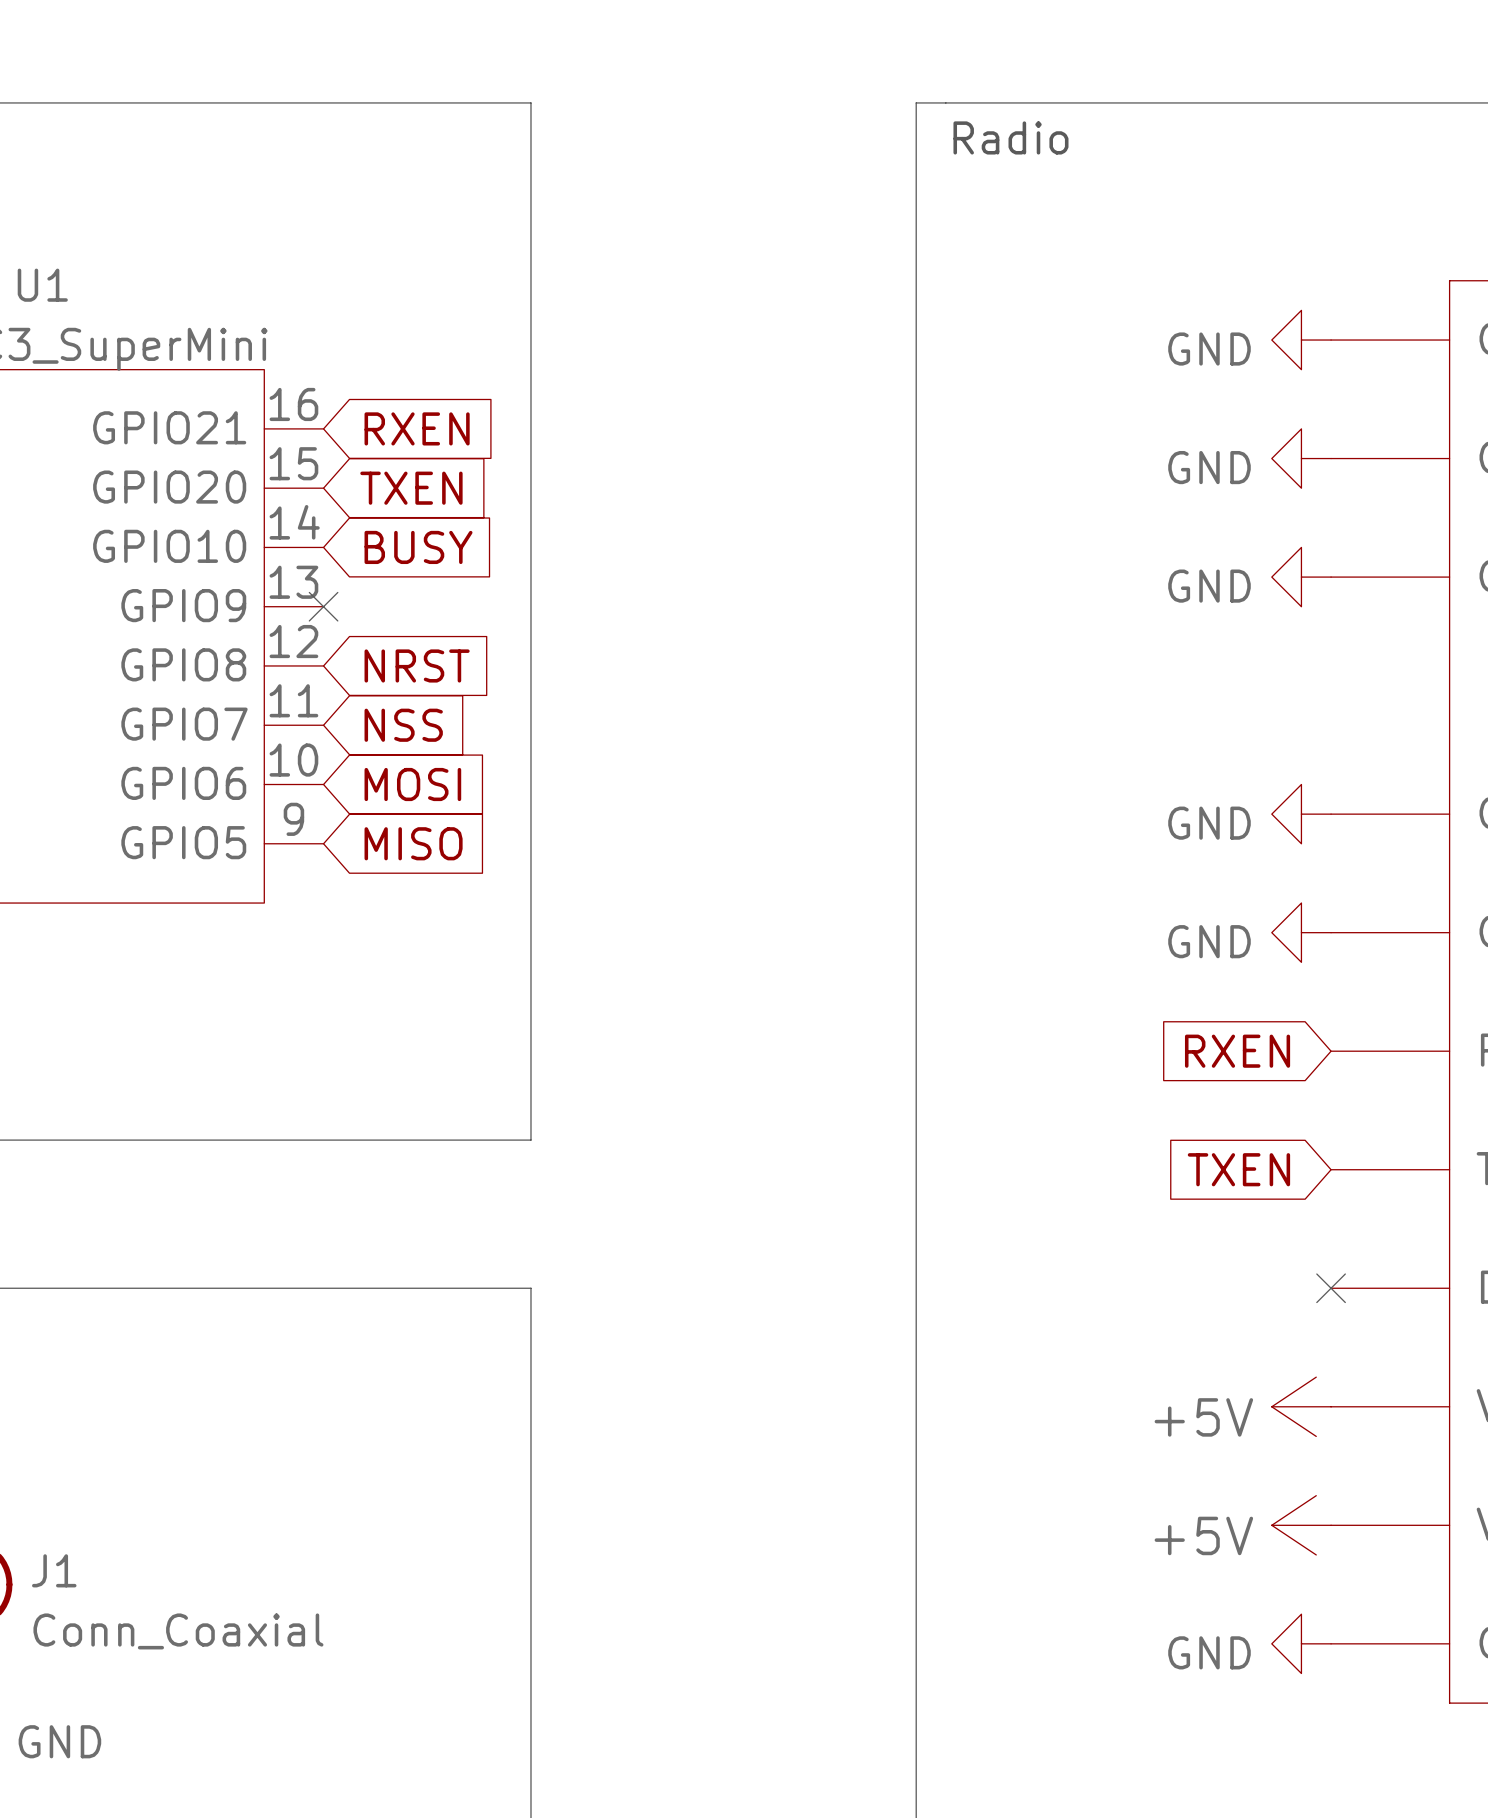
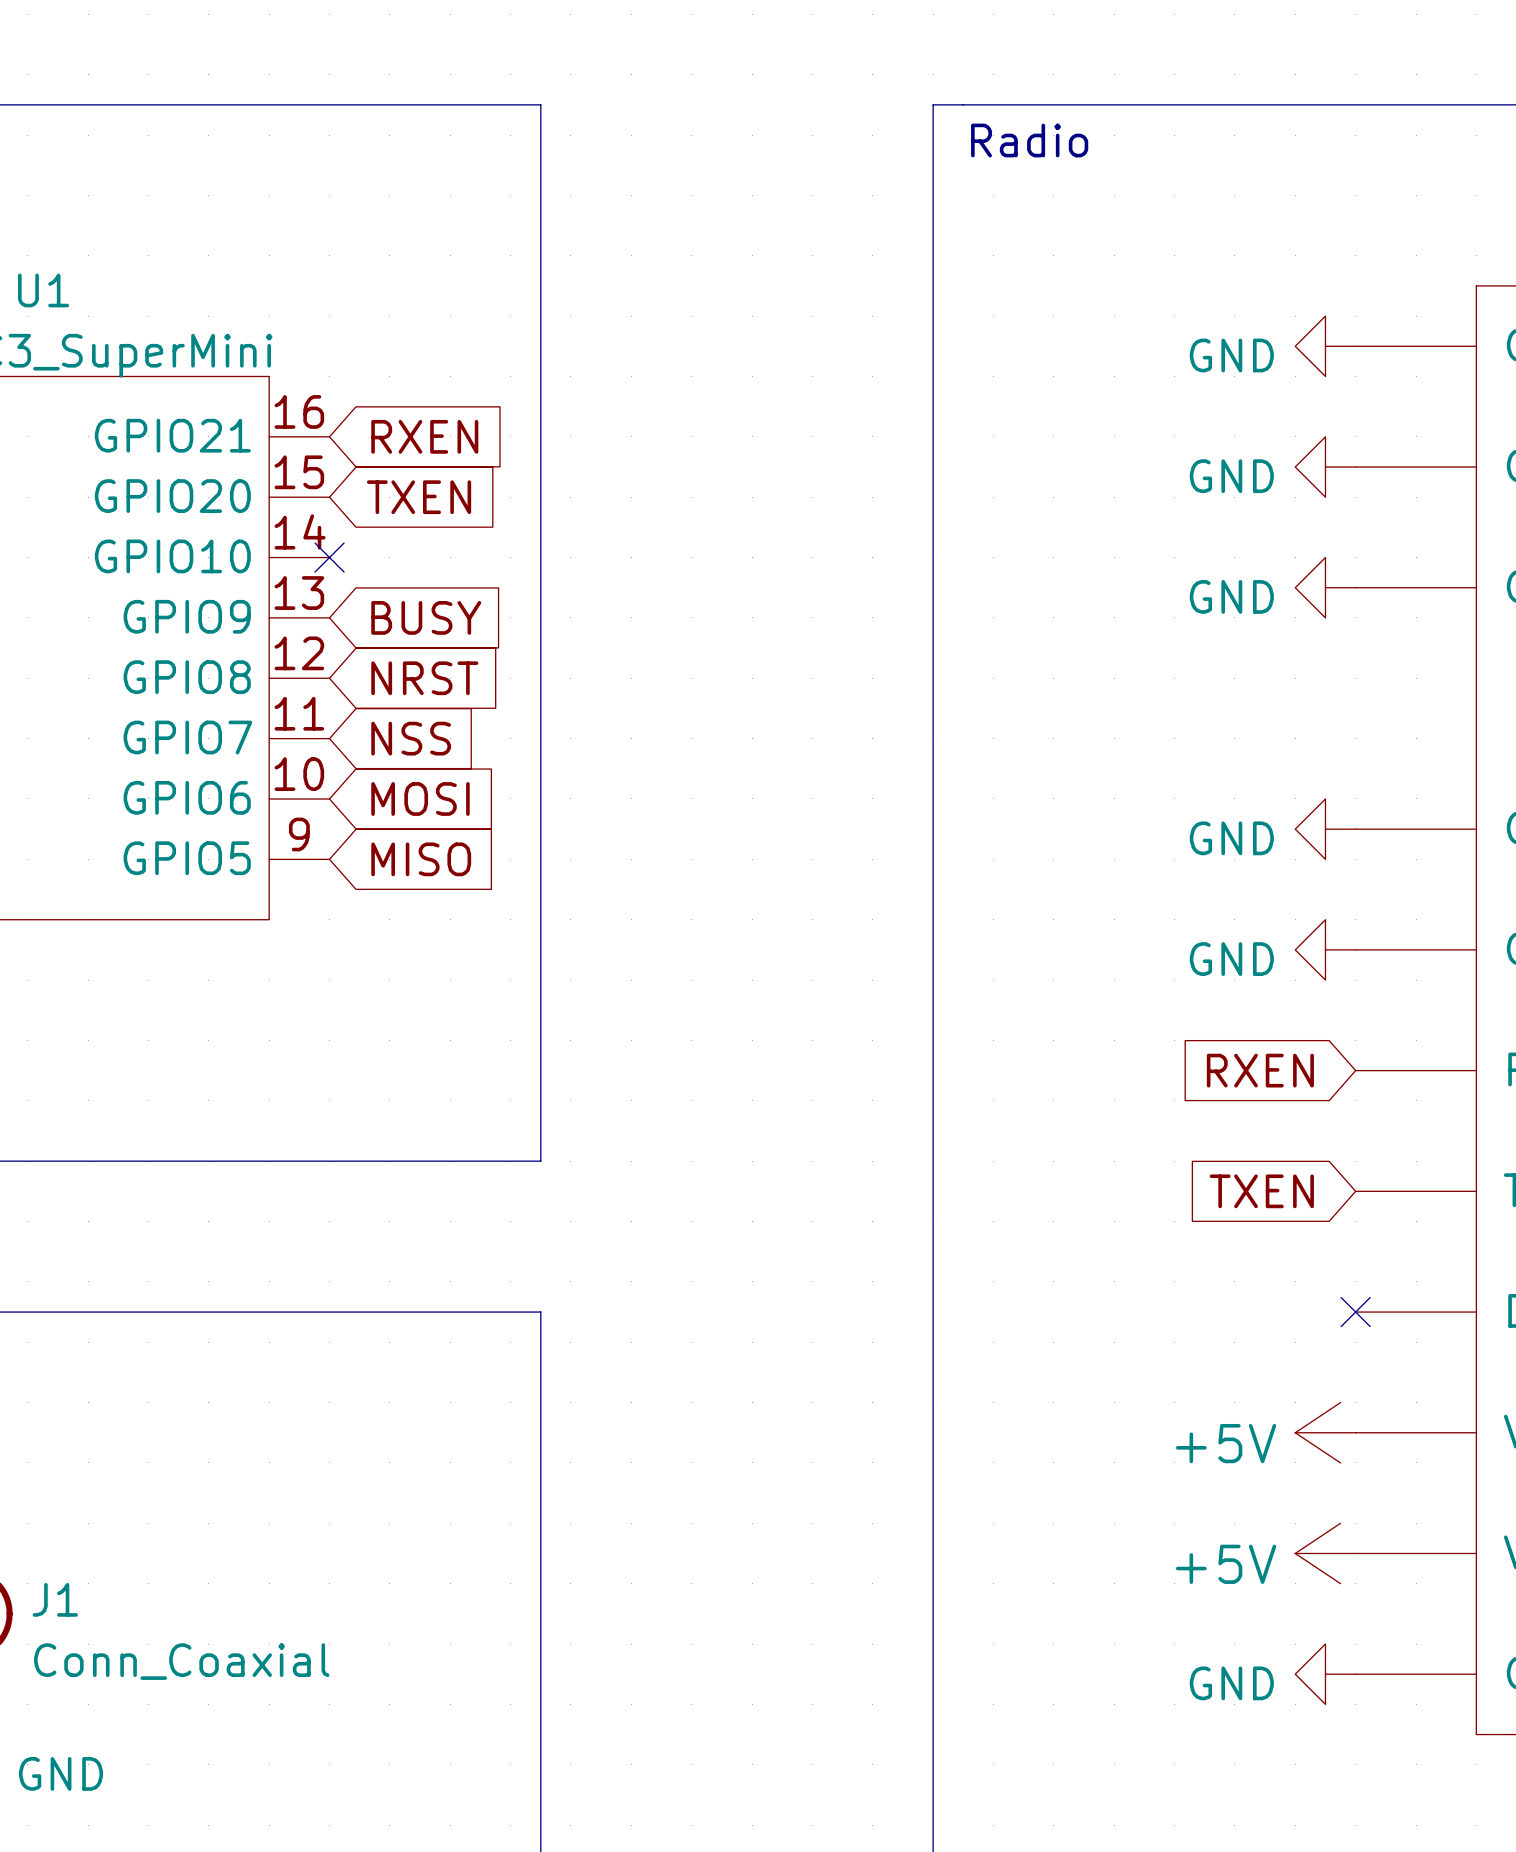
global label position: BUSY (418, 547) -> BUSY (426, 617)
no-connect mark position: (323, 606) -> (329, 557)

